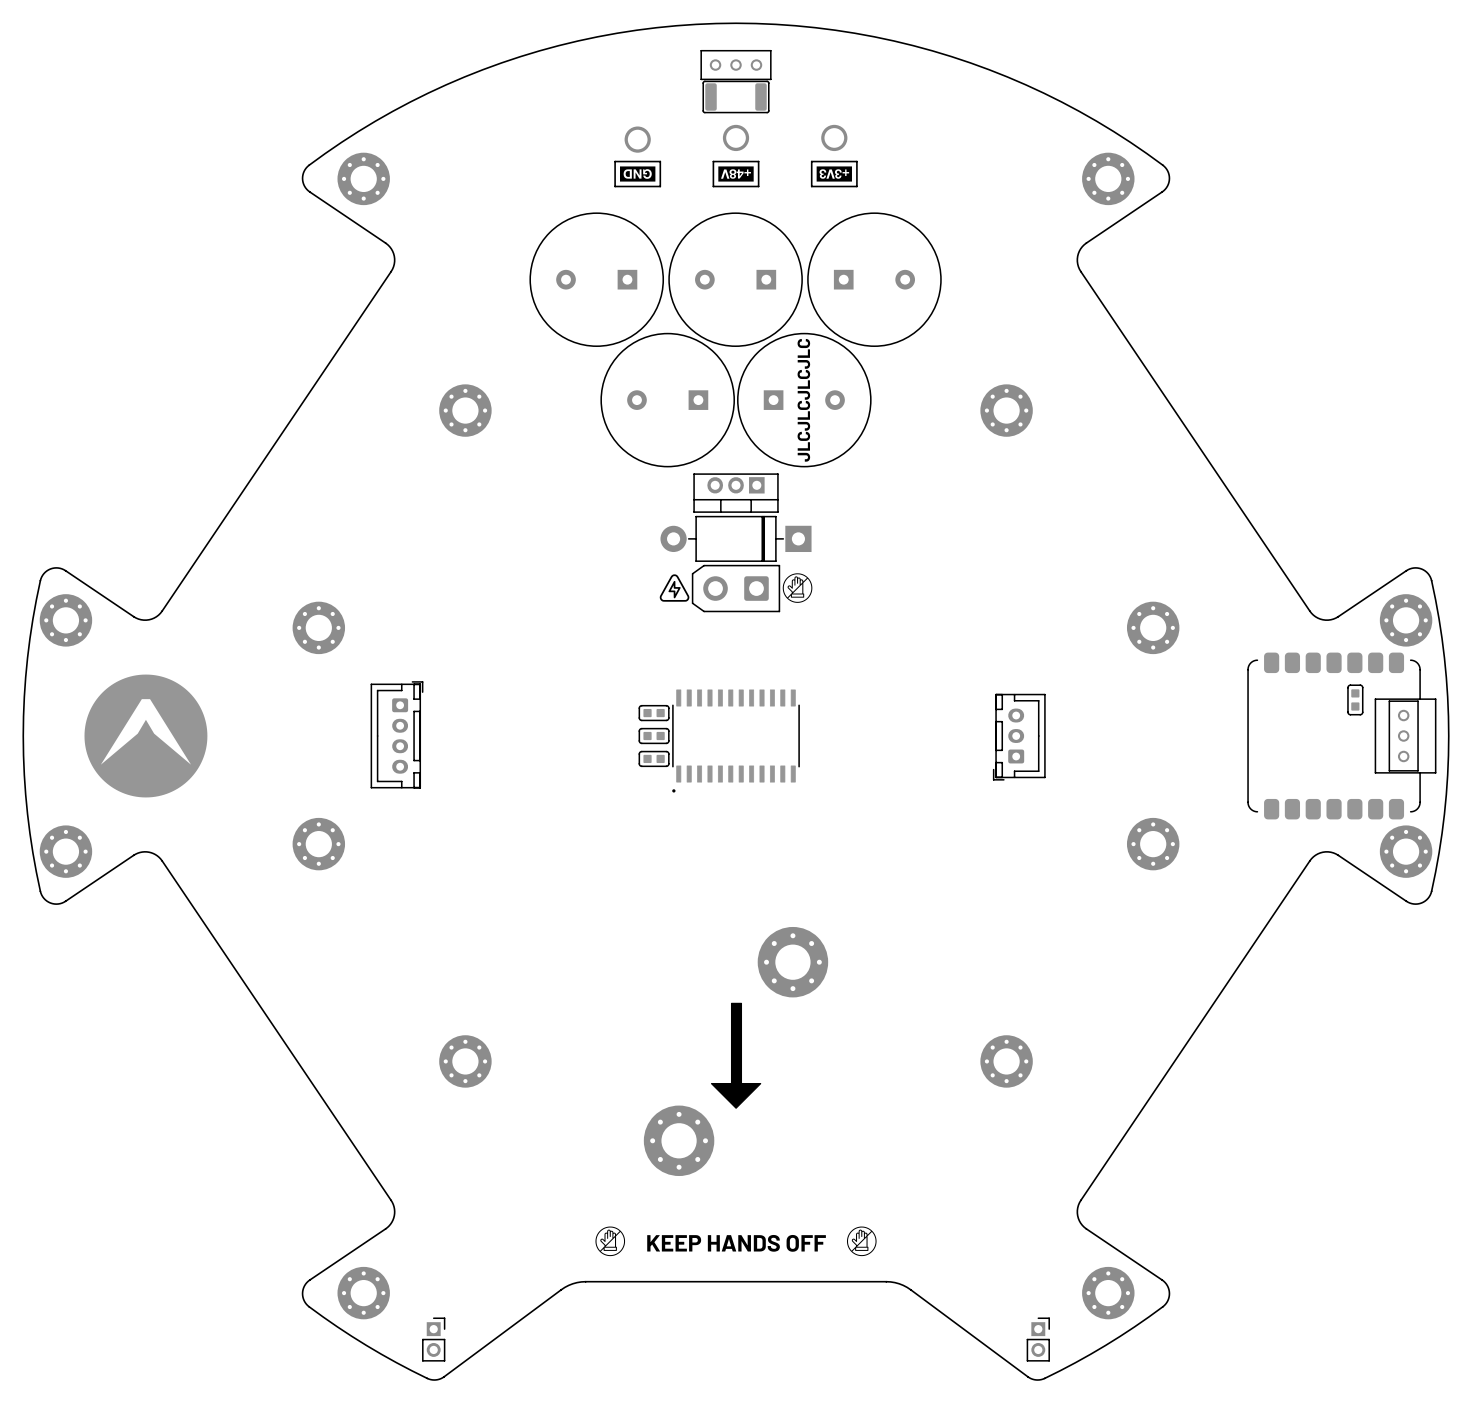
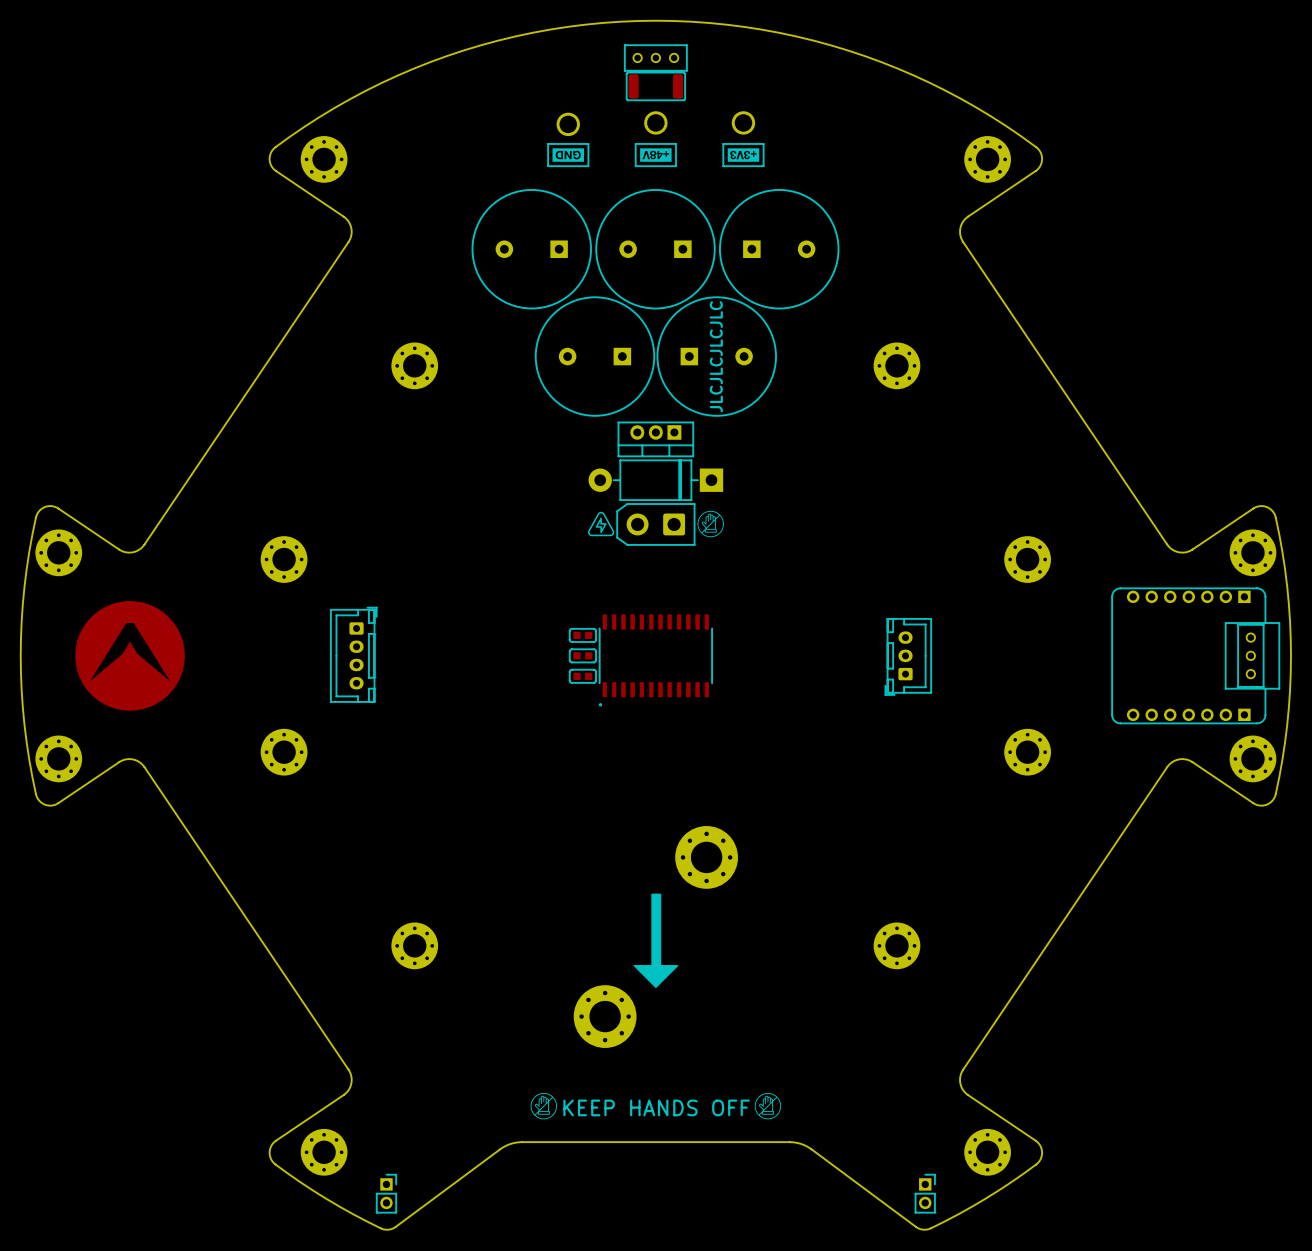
part footprint: [1247, 652, 1437, 820] -> [1111, 587, 1280, 724]
part: (1355, 699) -> none

